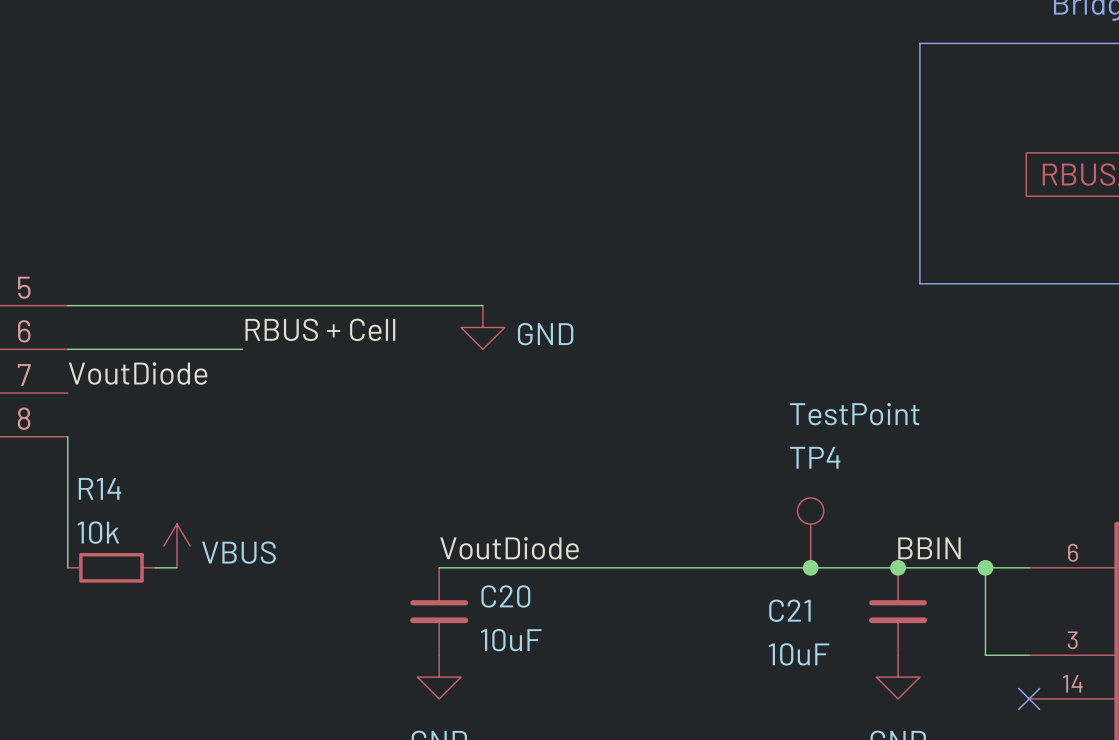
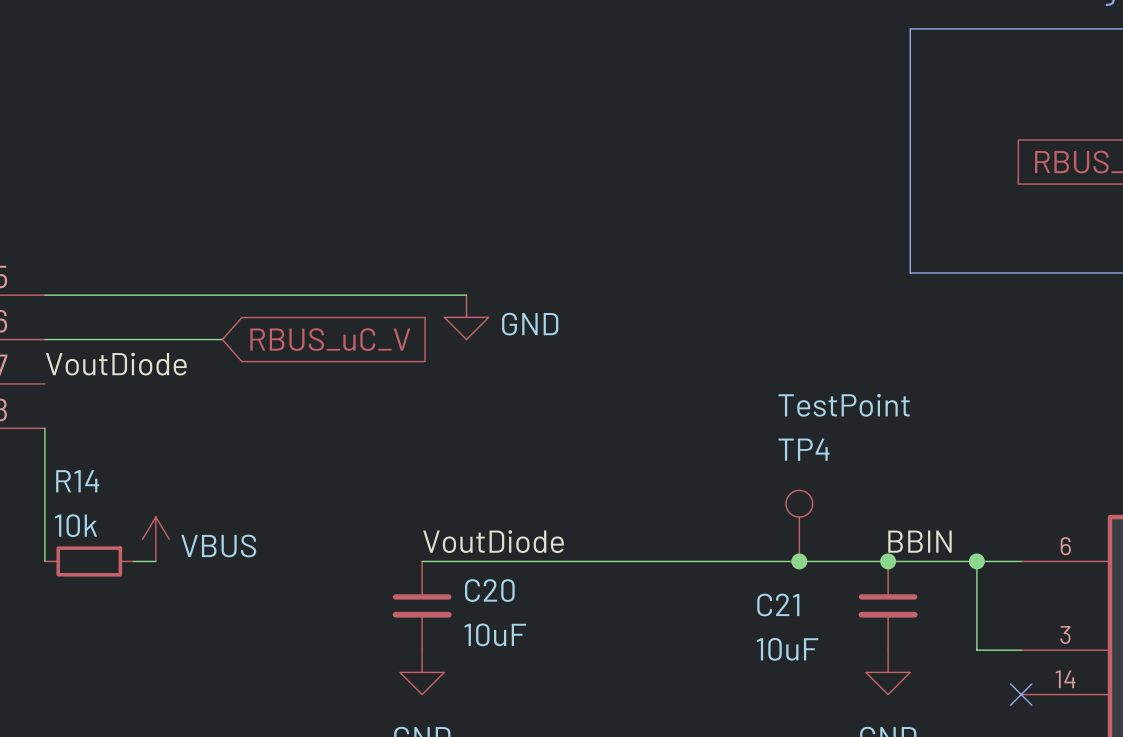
label: RBUS + Cell (320, 329) -> none
global label: none -> RBUS_uC_V (330, 339)

